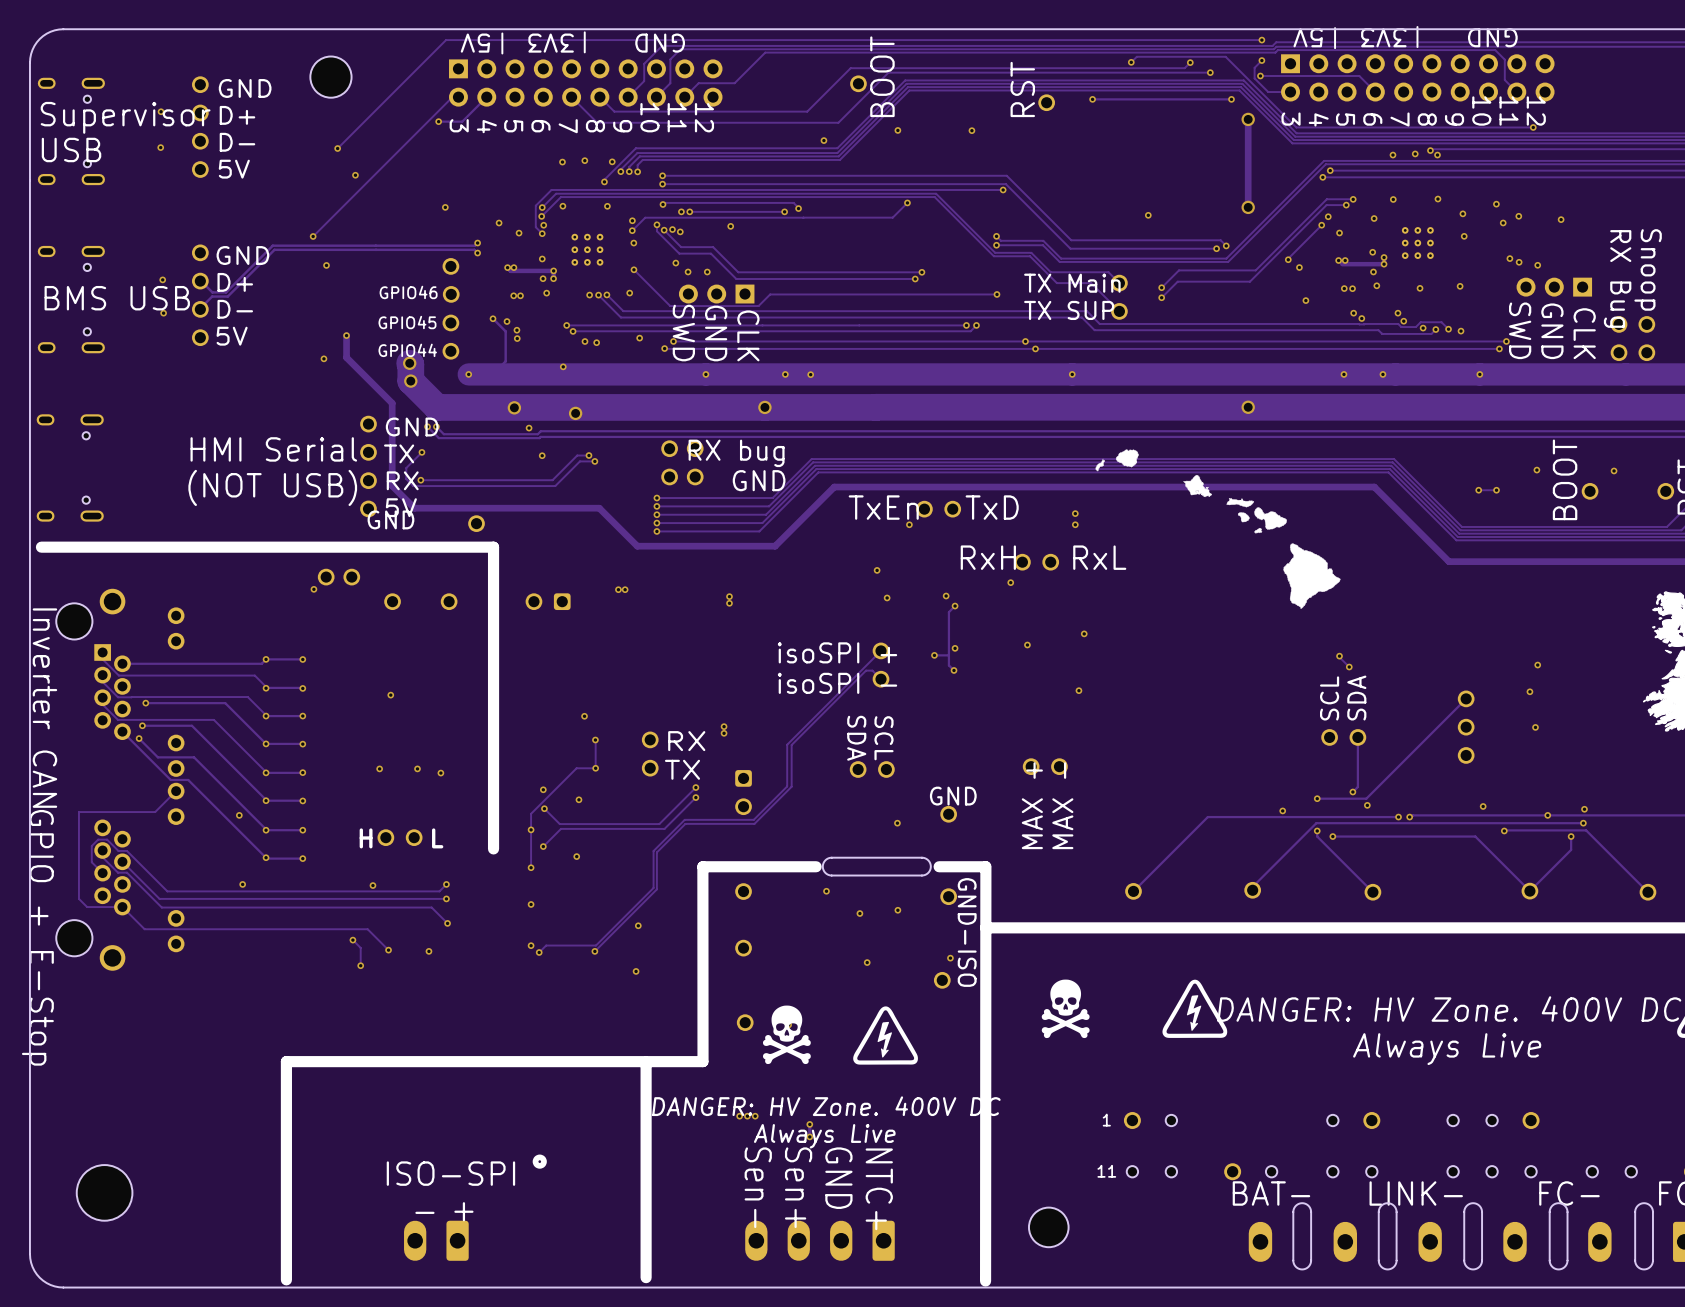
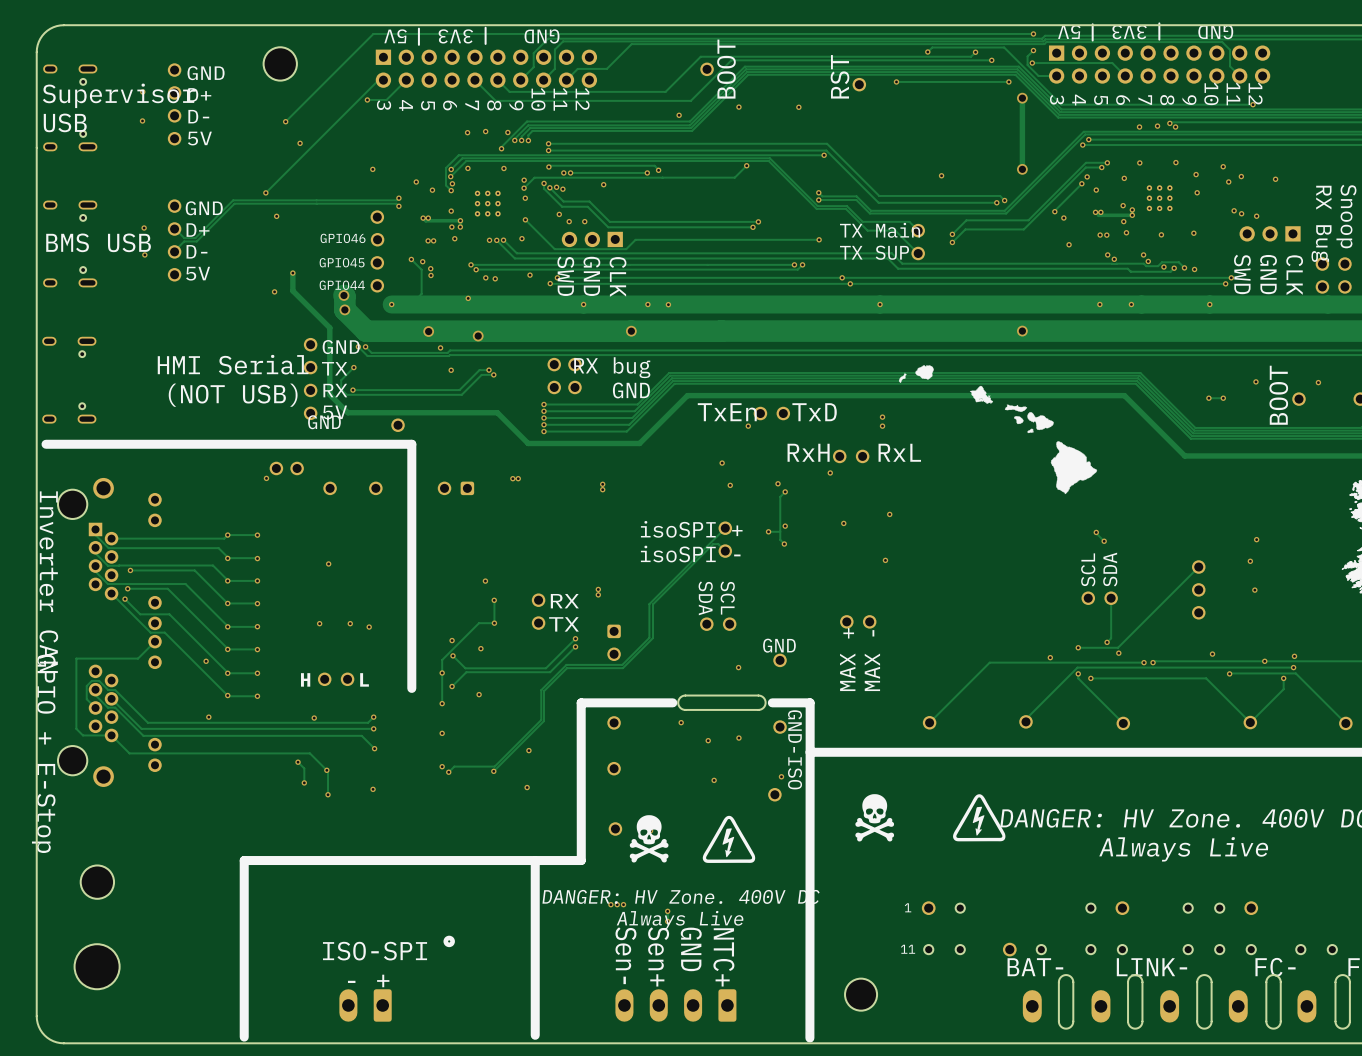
track: none -> (326, 770) (328, 794)
via: (428, 951) -> none
via: none -> (373, 789)
via: none -> (328, 794)
part: none -> (97, 882)

